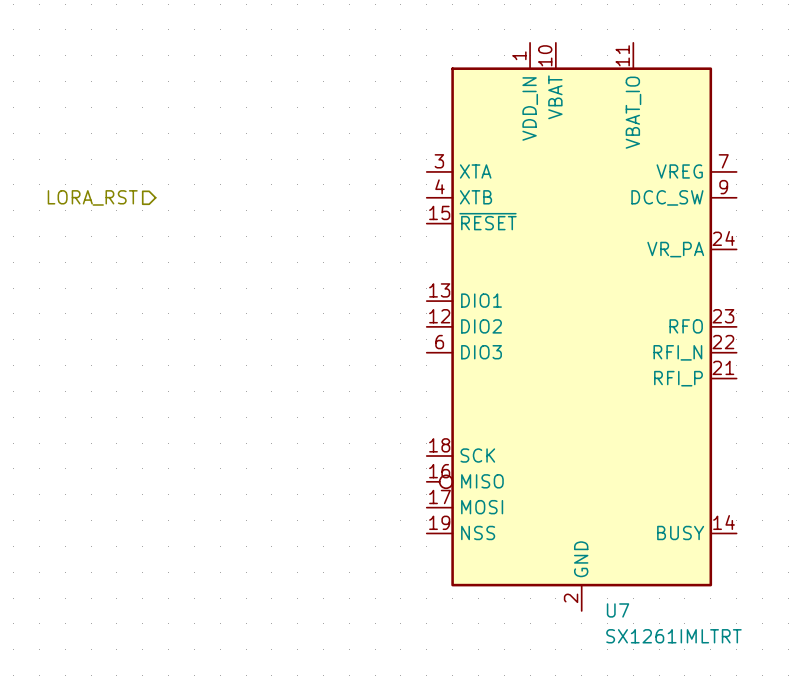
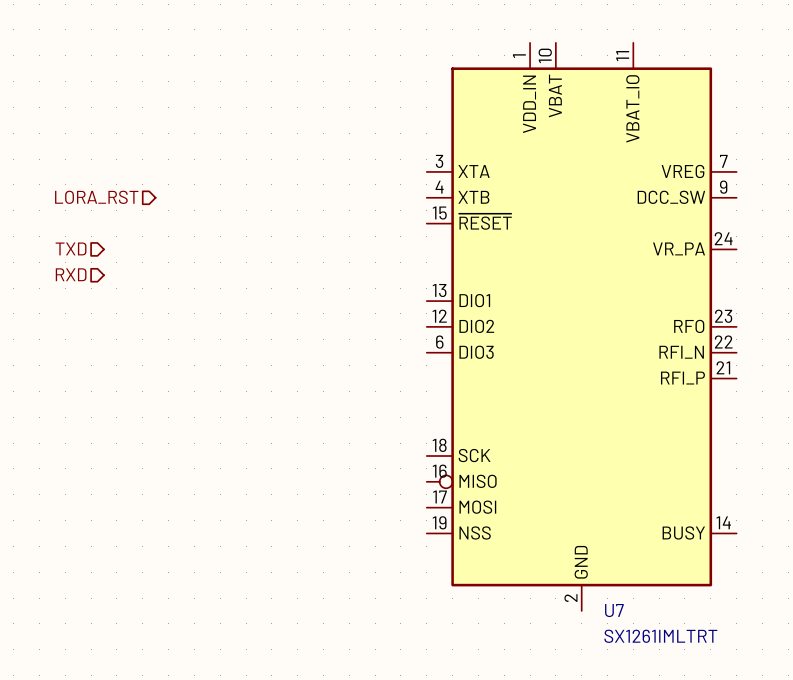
hierarchical label: none -> TXD (71, 248)
hierarchical label: none -> RXD (71, 274)

